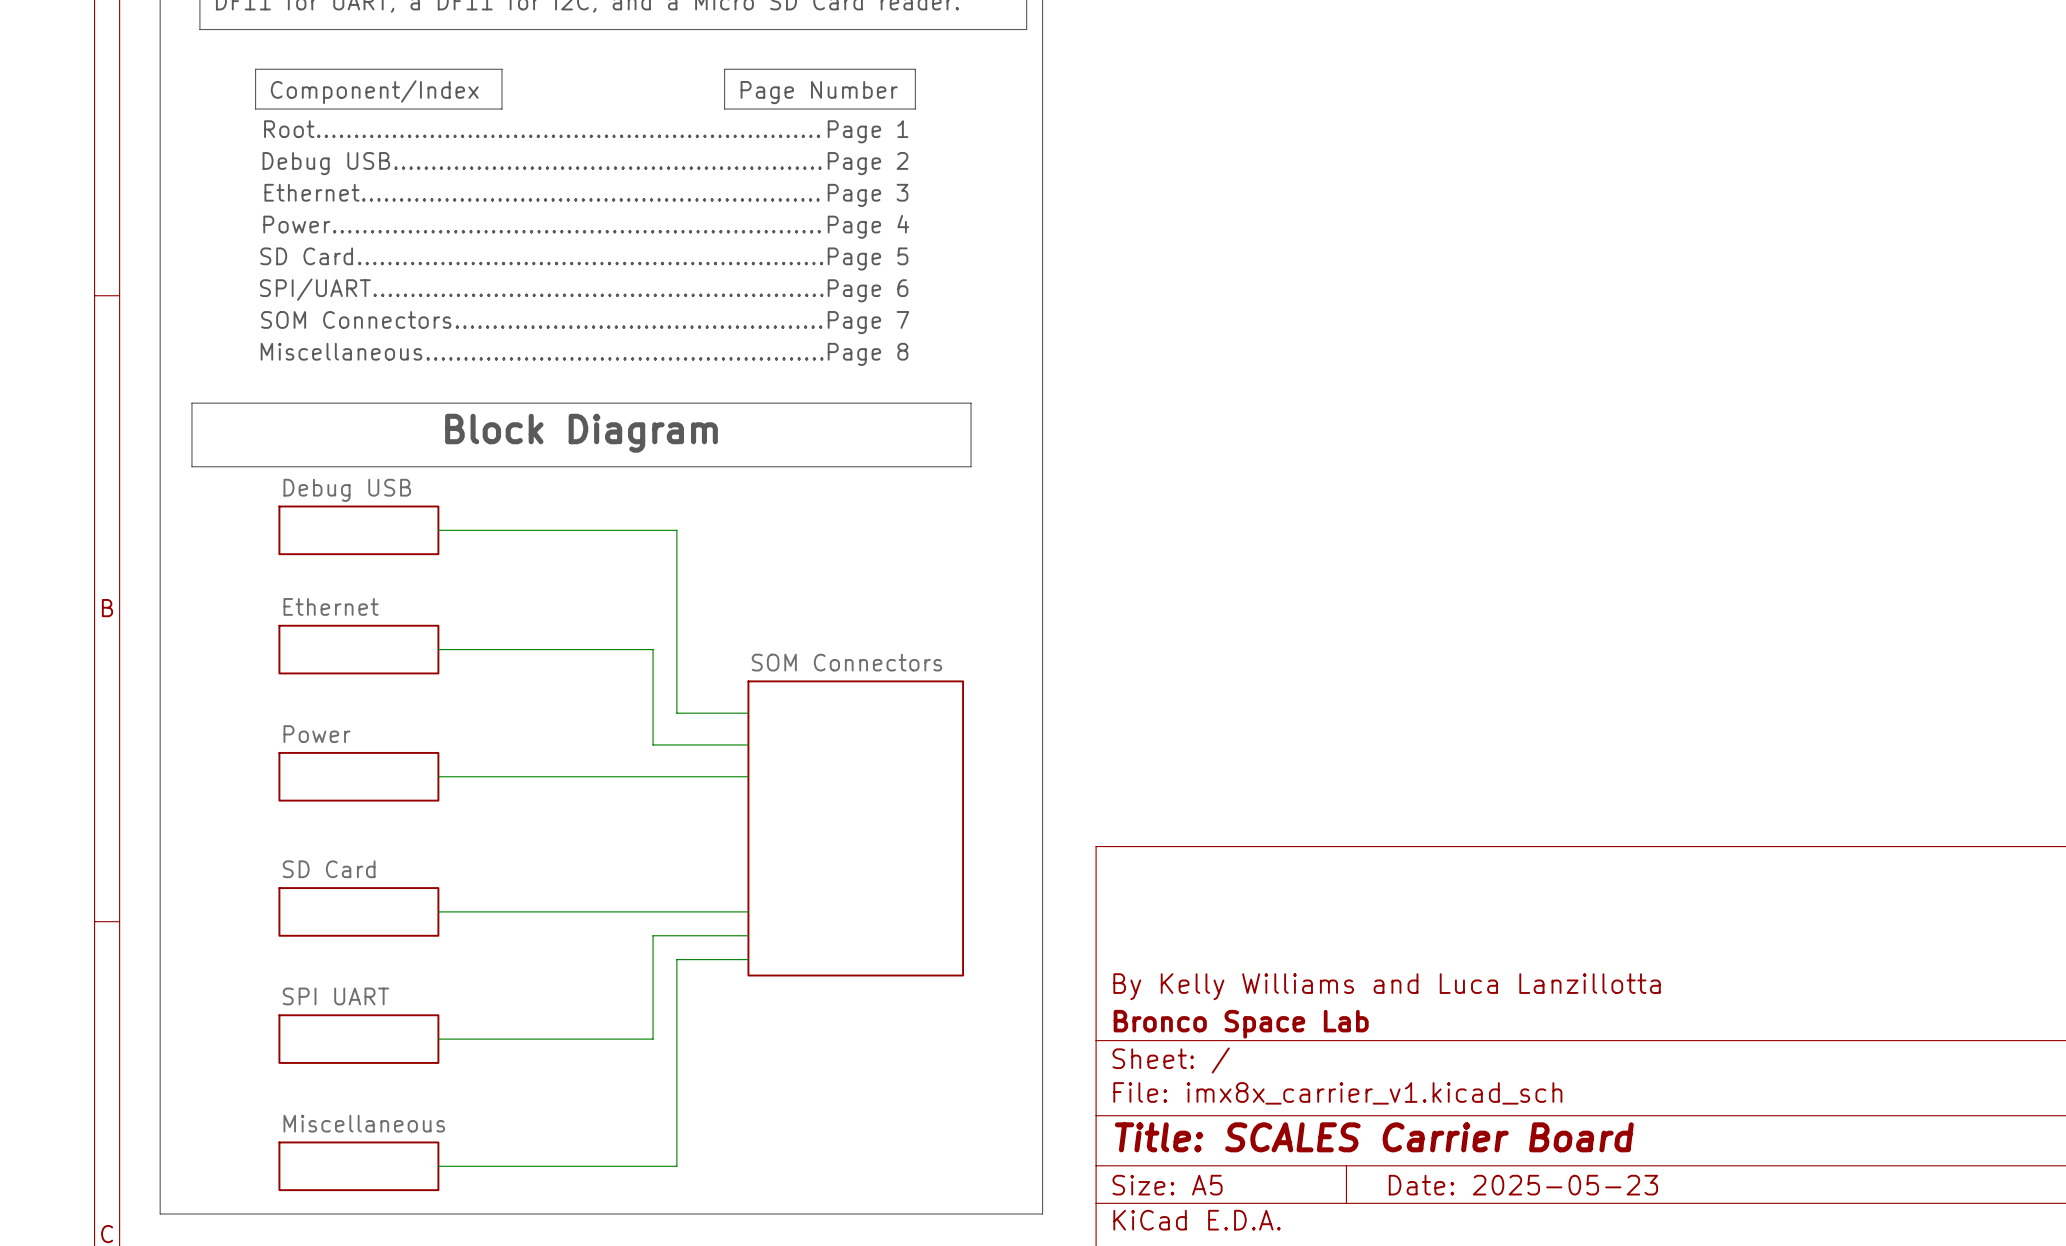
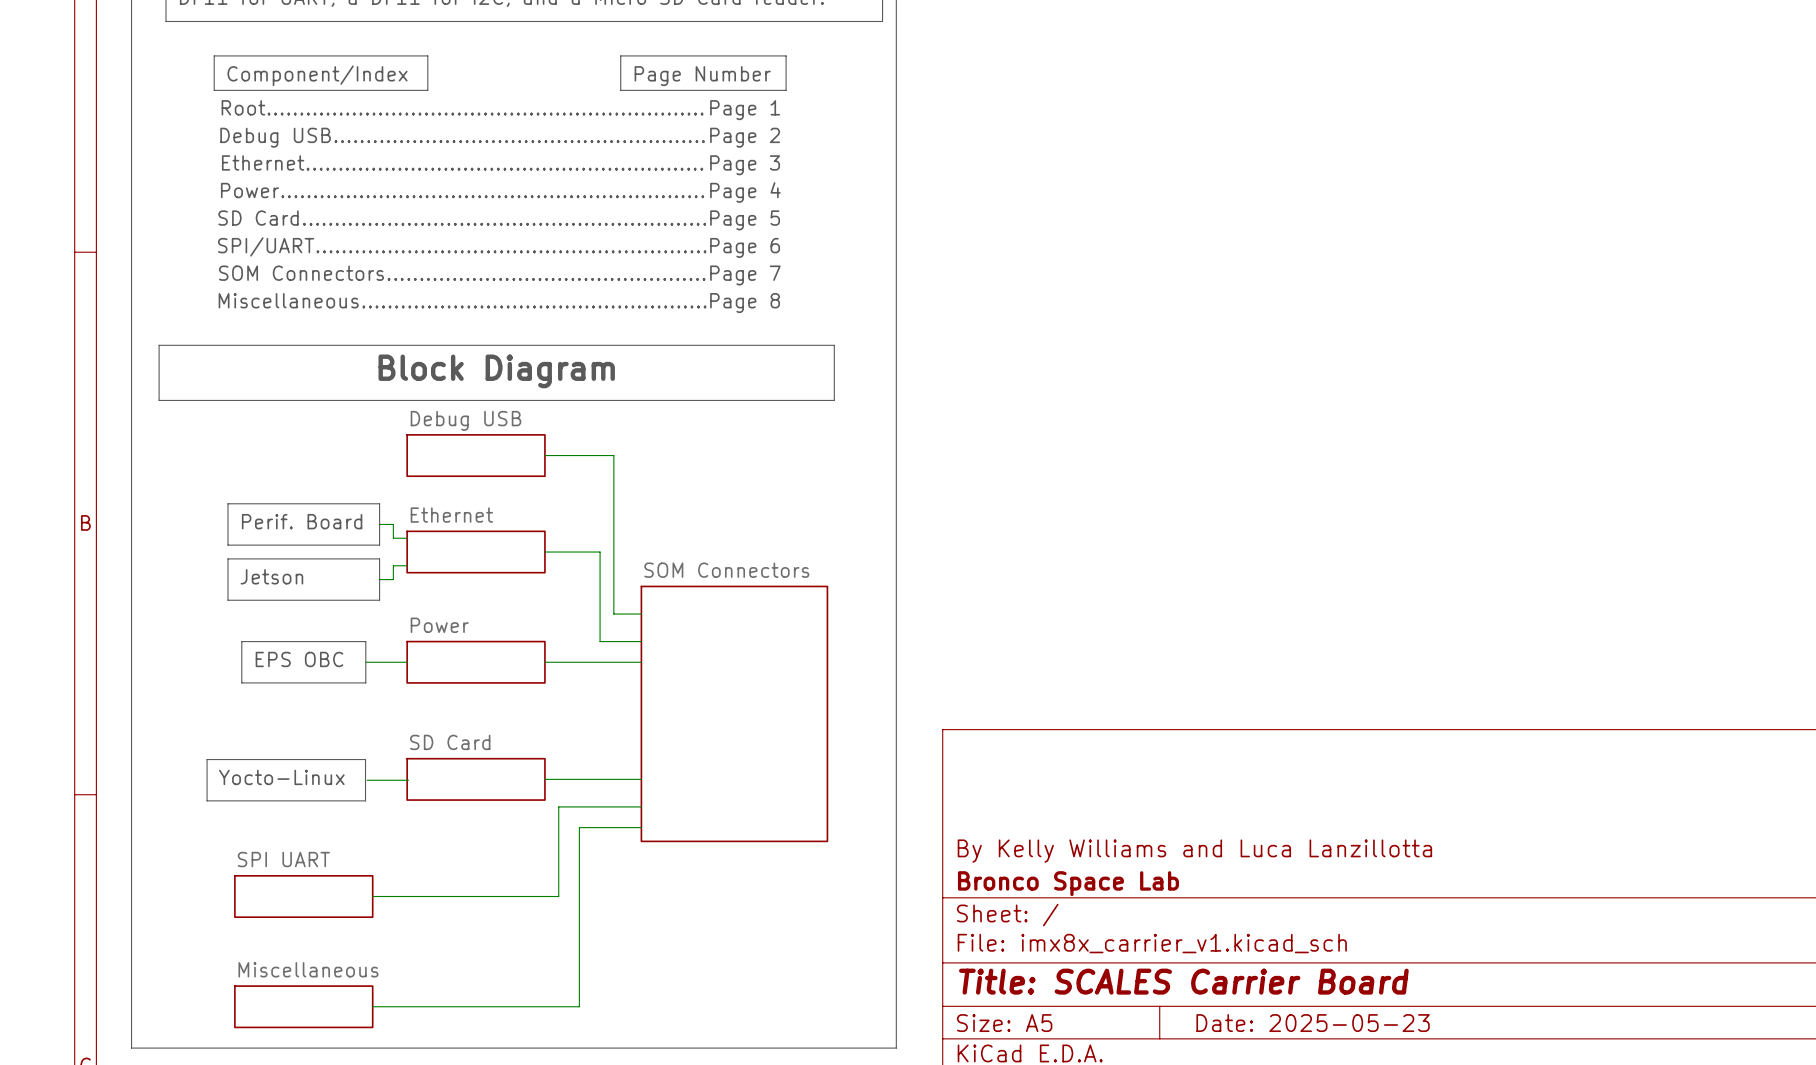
sheet Debug USB position: (358, 530) -> (476, 455)
wire: (438, 530) (637, 530) -> none
wire: (676, 530) (676, 713) (716, 713) -> (579, 455) (613, 455) (613, 614)
line: none -> (228, 503) (228, 545) (379, 545) (379, 503) (228, 503)
text: none -> Perif. Board (302, 521)
wire: none -> (379, 524) (393, 524) (393, 538) (407, 538)
line: none -> (228, 558) (379, 558) (379, 600) (228, 600) (228, 558)
sheet Ethernet position: (358, 649) -> (476, 552)
wire: (438, 649) (653, 649) (653, 744) (700, 744) -> (544, 552) (600, 552) (600, 641)
wire: none -> (407, 565) (393, 565) (393, 579) (379, 579)
text: none -> Jetson (271, 576)
line: none -> (241, 641) (365, 641) (365, 682) (241, 682) (241, 641)
text: none -> EPS OBC (299, 659)
wire: none -> (365, 662) (407, 662)
wire: none -> (544, 662) (641, 662)
sheet Power position: (358, 776) -> (476, 662)
wire: (438, 776) (748, 776) -> none
line: none -> (207, 759) (365, 759) (365, 800) (207, 800) (207, 759)
text: none -> Yocto-Linux (281, 777)
wire: none -> (544, 779) (641, 779)
wire: none -> (367, 780) (408, 780)
sheet SD Card position: (358, 911) -> (476, 779)
wire: (438, 911) (748, 911) -> none

